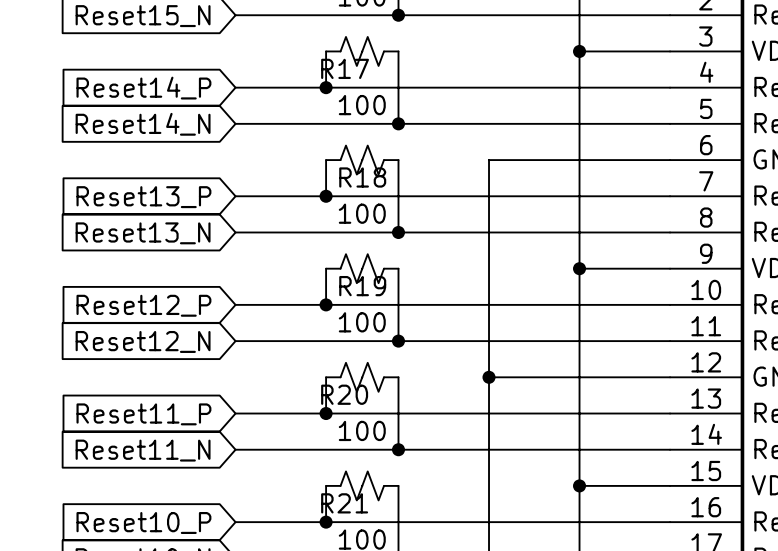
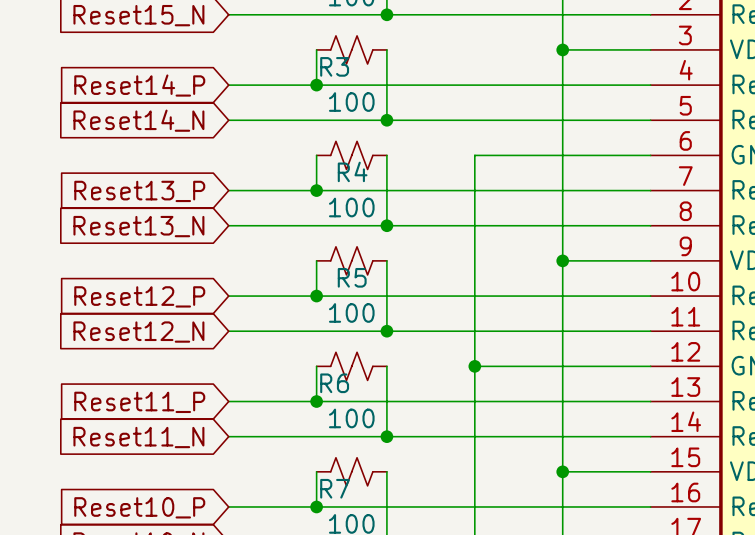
R17 name: R17 (345, 68) -> R3 (334, 66)
R18 name: R18 (362, 177) -> R4 (352, 171)
R19 name: R19 (362, 286) -> R5 (352, 277)
R20 name: R20 (344, 394) -> R6 (334, 383)
R21 name: R21 (344, 503) -> R7 (335, 488)

